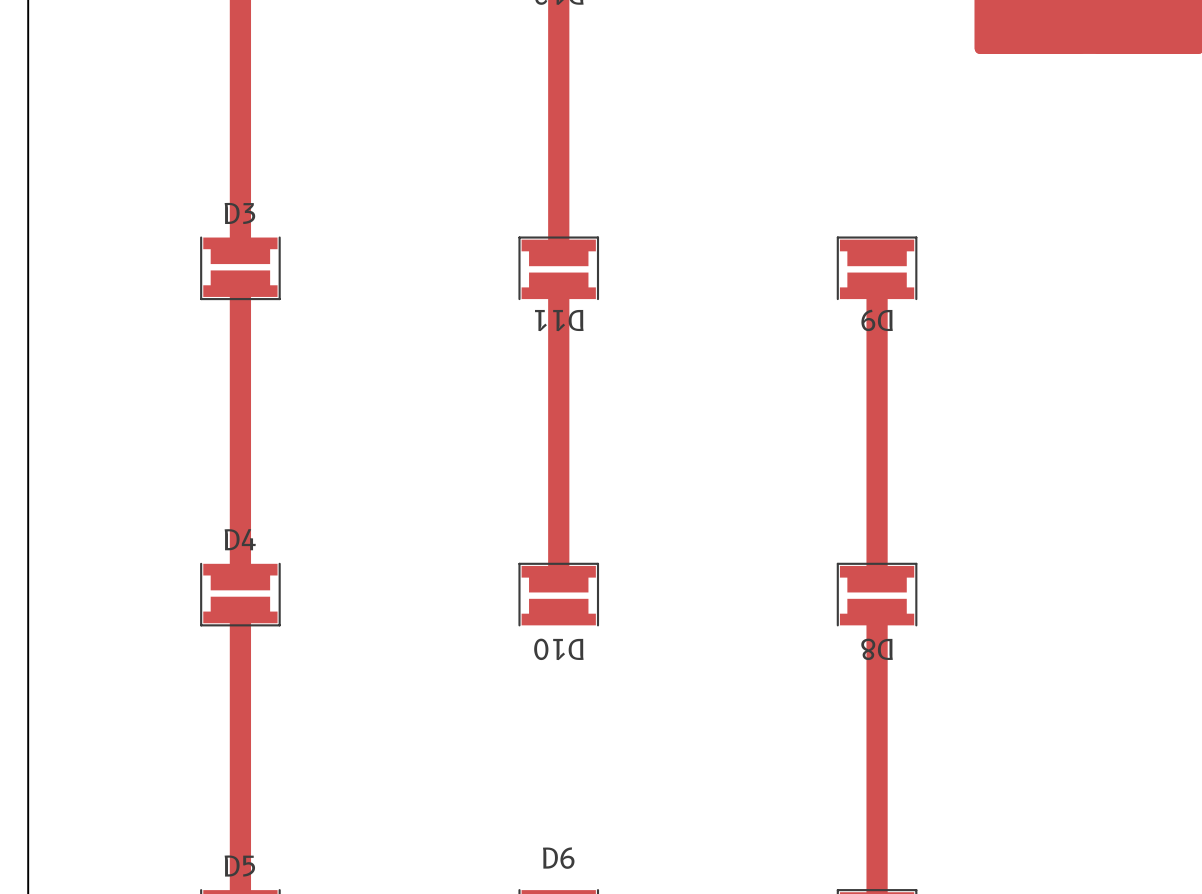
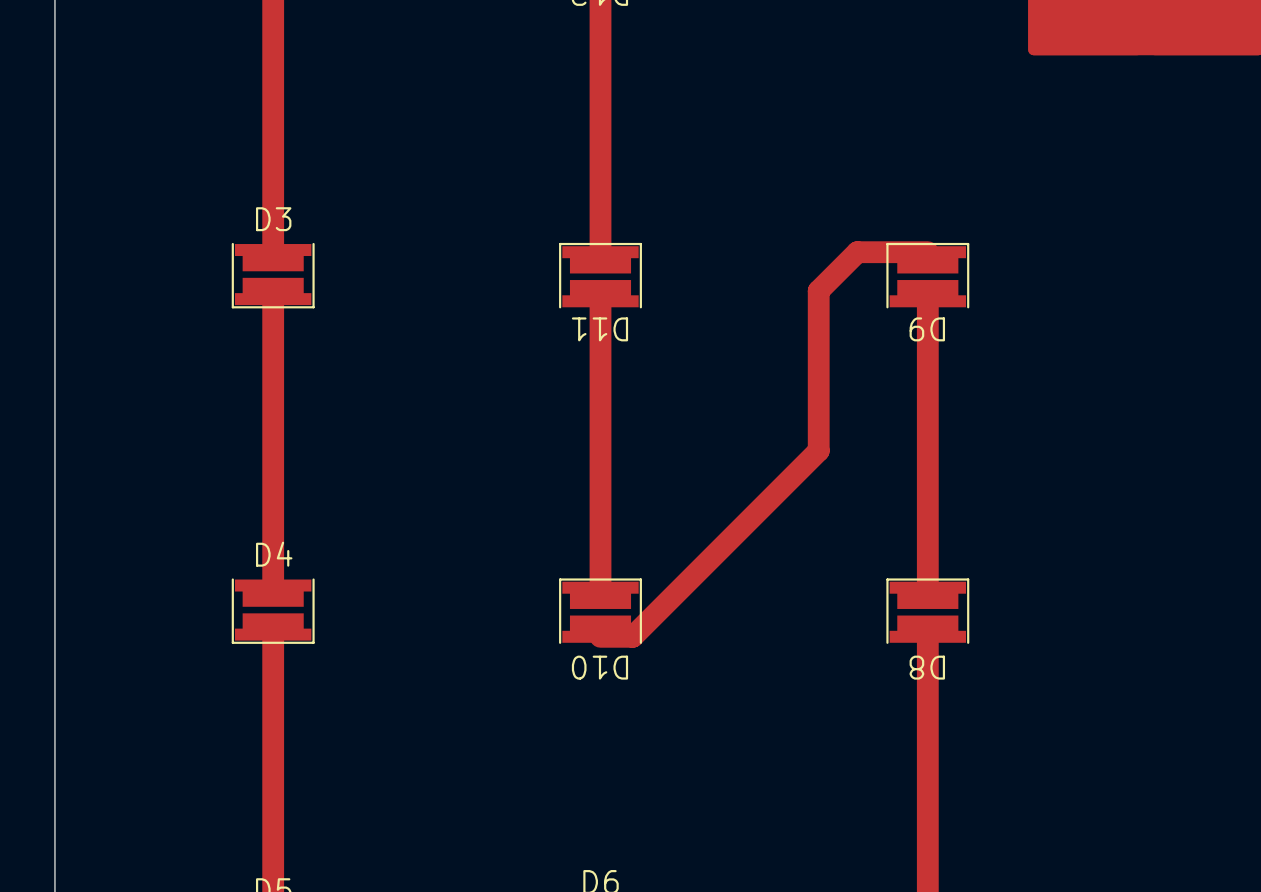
track: none -> (927, 252) (857, 252) (818, 290) (818, 450) (632, 636) (600, 636)

